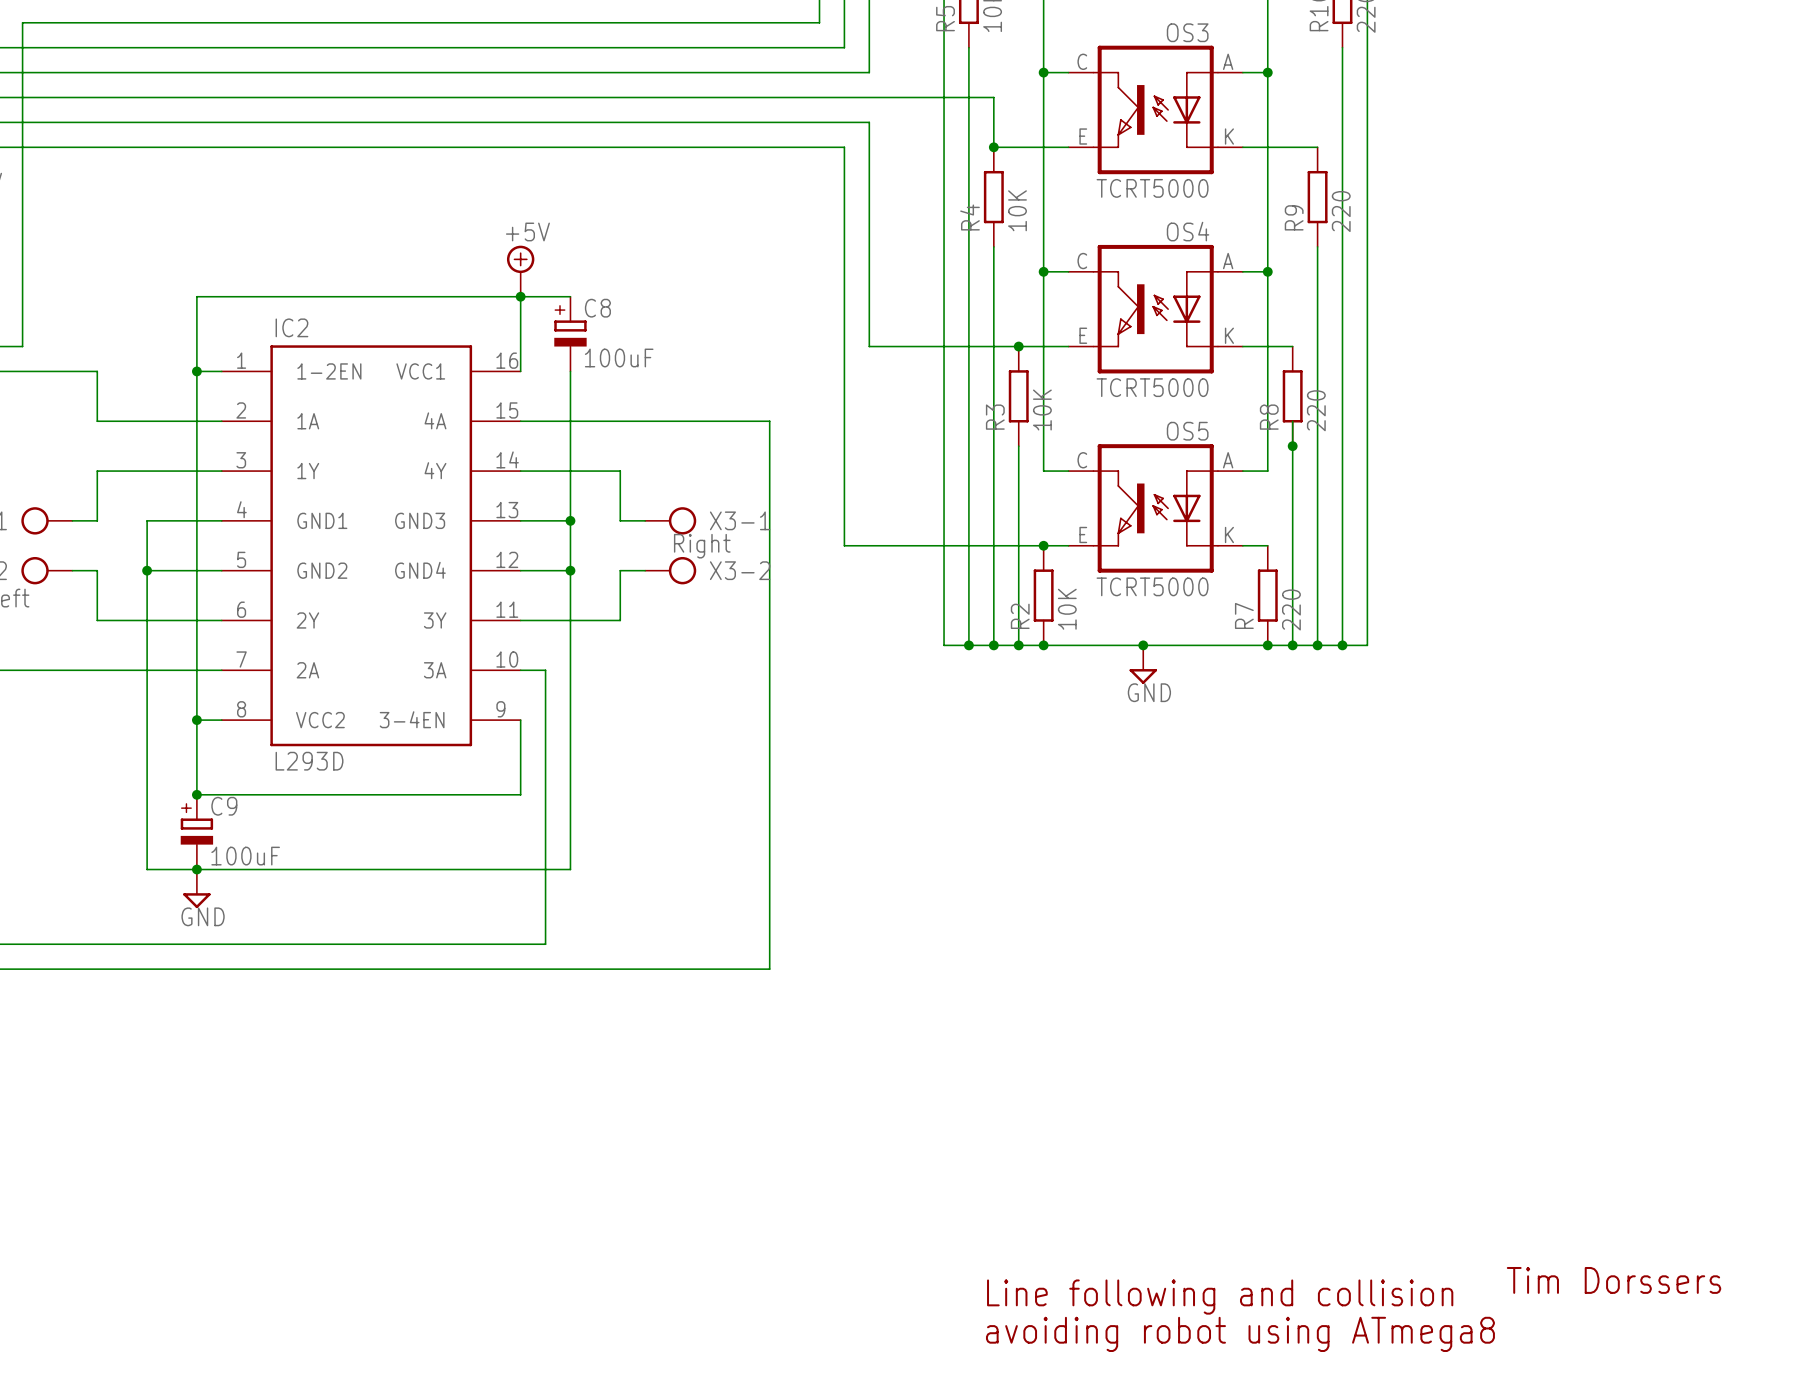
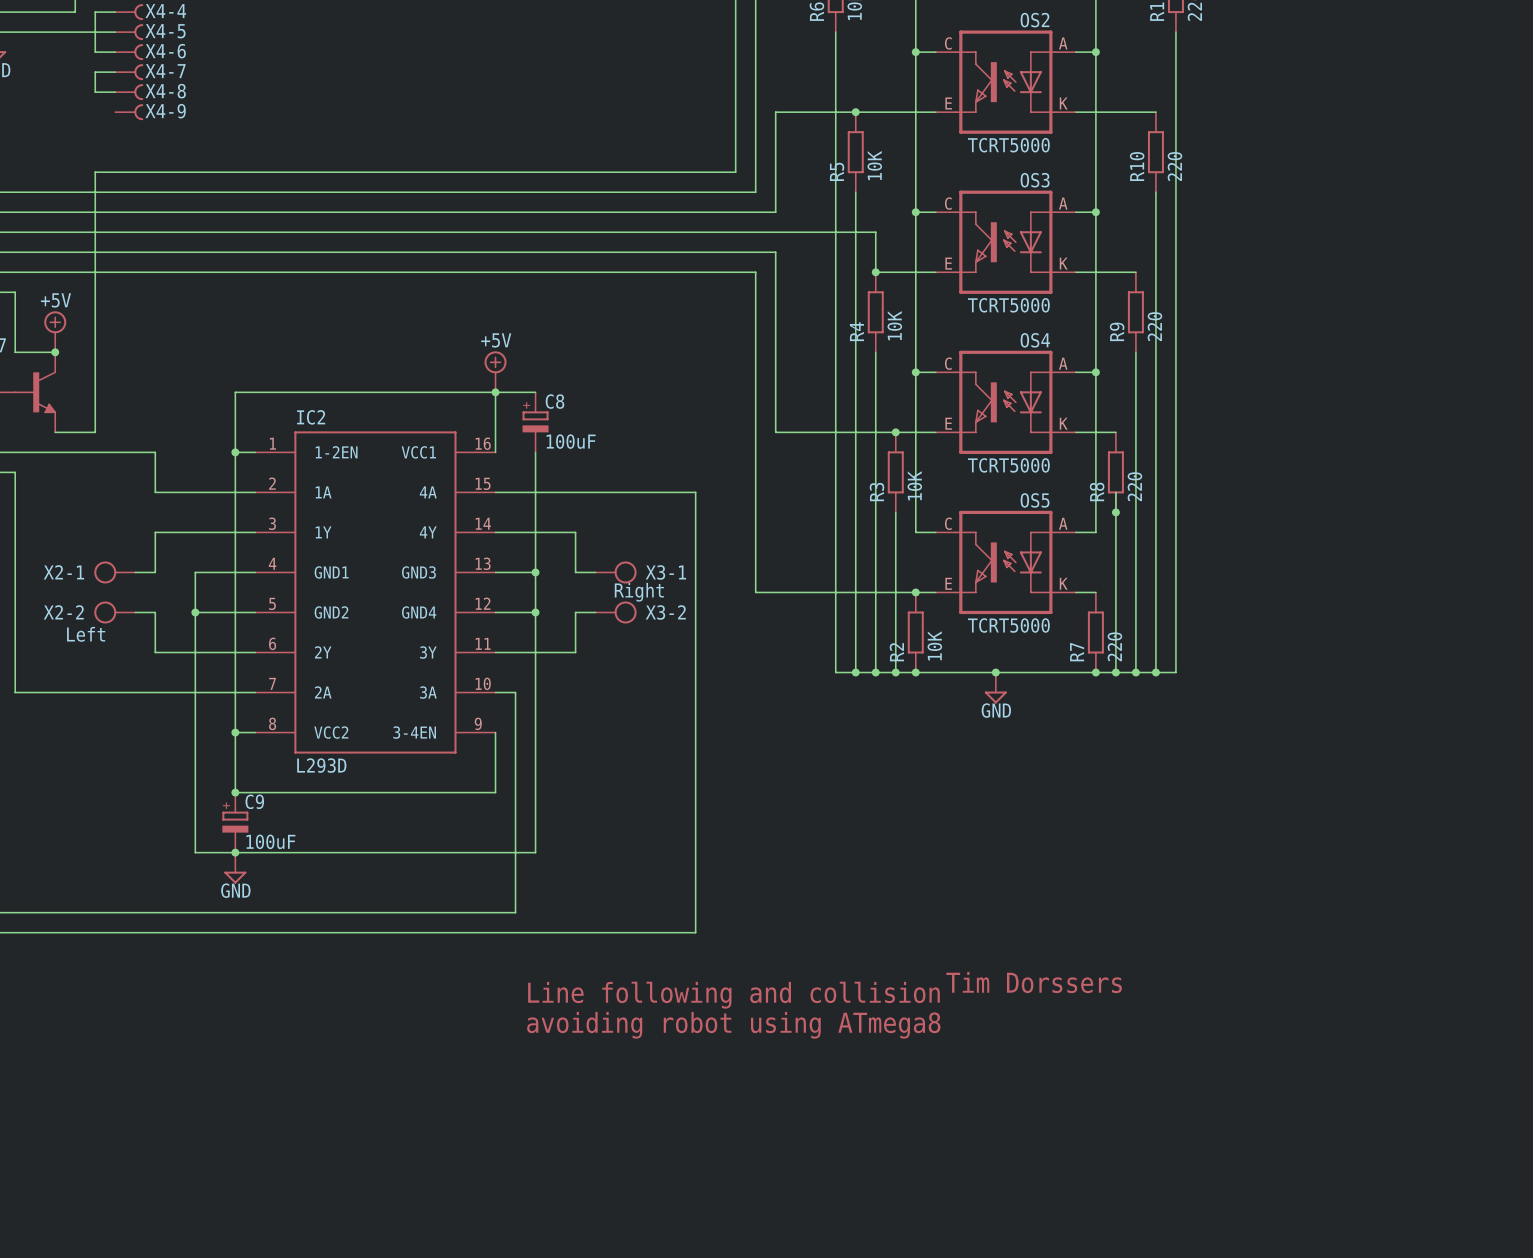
text: none -> Tim Dorssers (1034, 982)
text: none -> Line following and collision (733, 995)
text: none -> avoiding robot using ATmega8 (733, 1025)
text: Tim Dorssers (1614, 1280) -> none
text: Line following and collision (1220, 1297) -> none
text: avoiding robot using ATmega8 (1240, 1334) -> none

